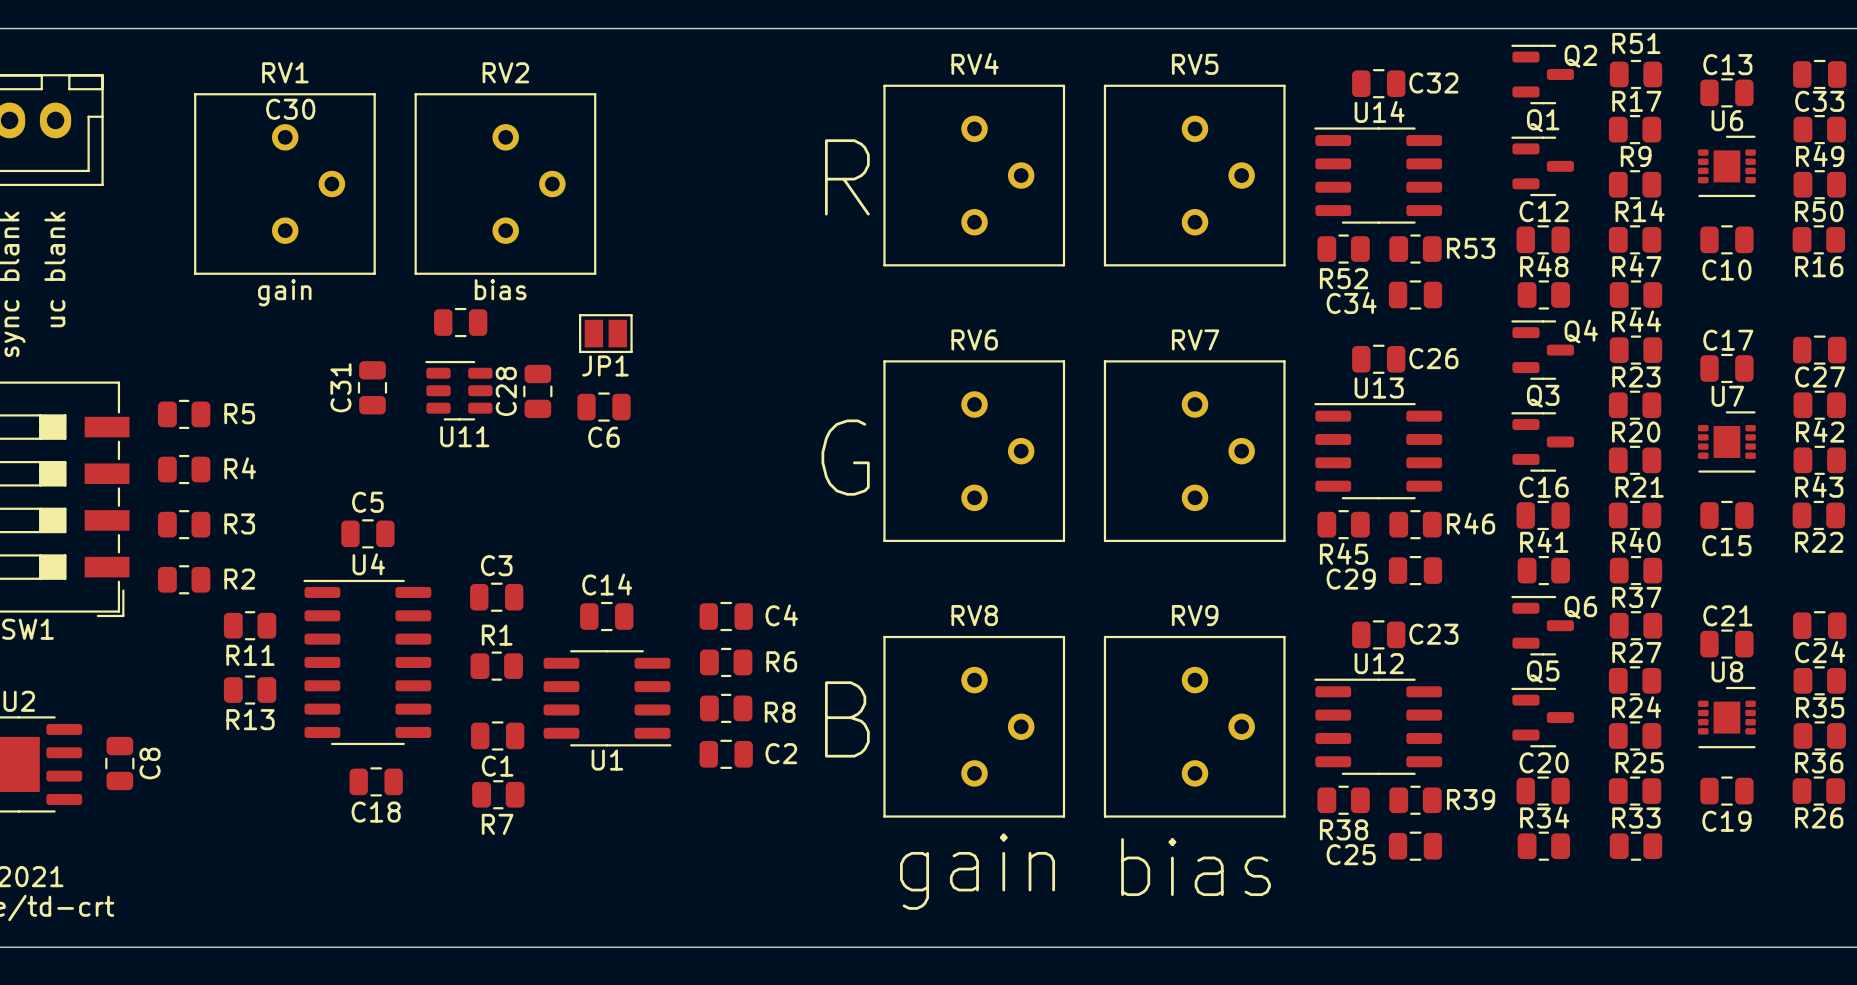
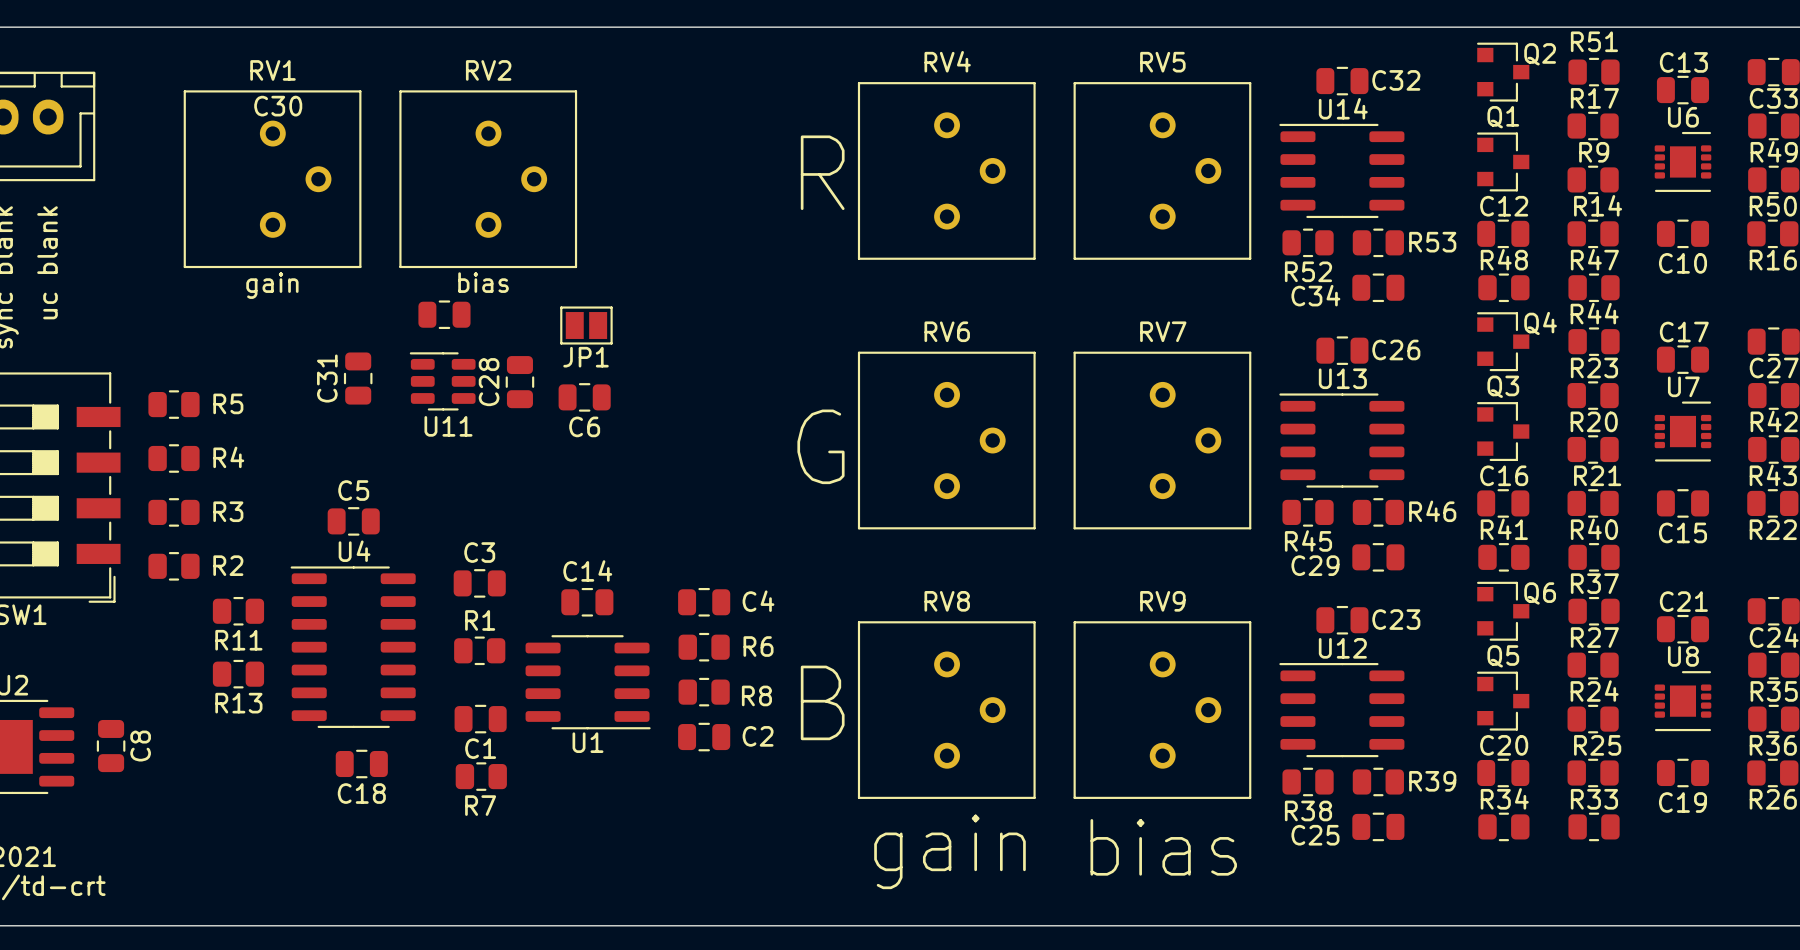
Q2 footprint: [1511, 44, 1574, 105] -> [1477, 42, 1530, 102]
Q1 footprint: [1511, 136, 1574, 197] -> [1477, 132, 1530, 192]
Q4 footprint: [1511, 320, 1574, 380] -> [1477, 312, 1530, 372]
Q3 footprint: [1511, 412, 1574, 472] -> [1477, 402, 1530, 462]
Q6 footprint: [1511, 595, 1574, 656] -> [1477, 581, 1530, 641]
Q5 footprint: [1511, 687, 1574, 748] -> [1477, 671, 1530, 731]

